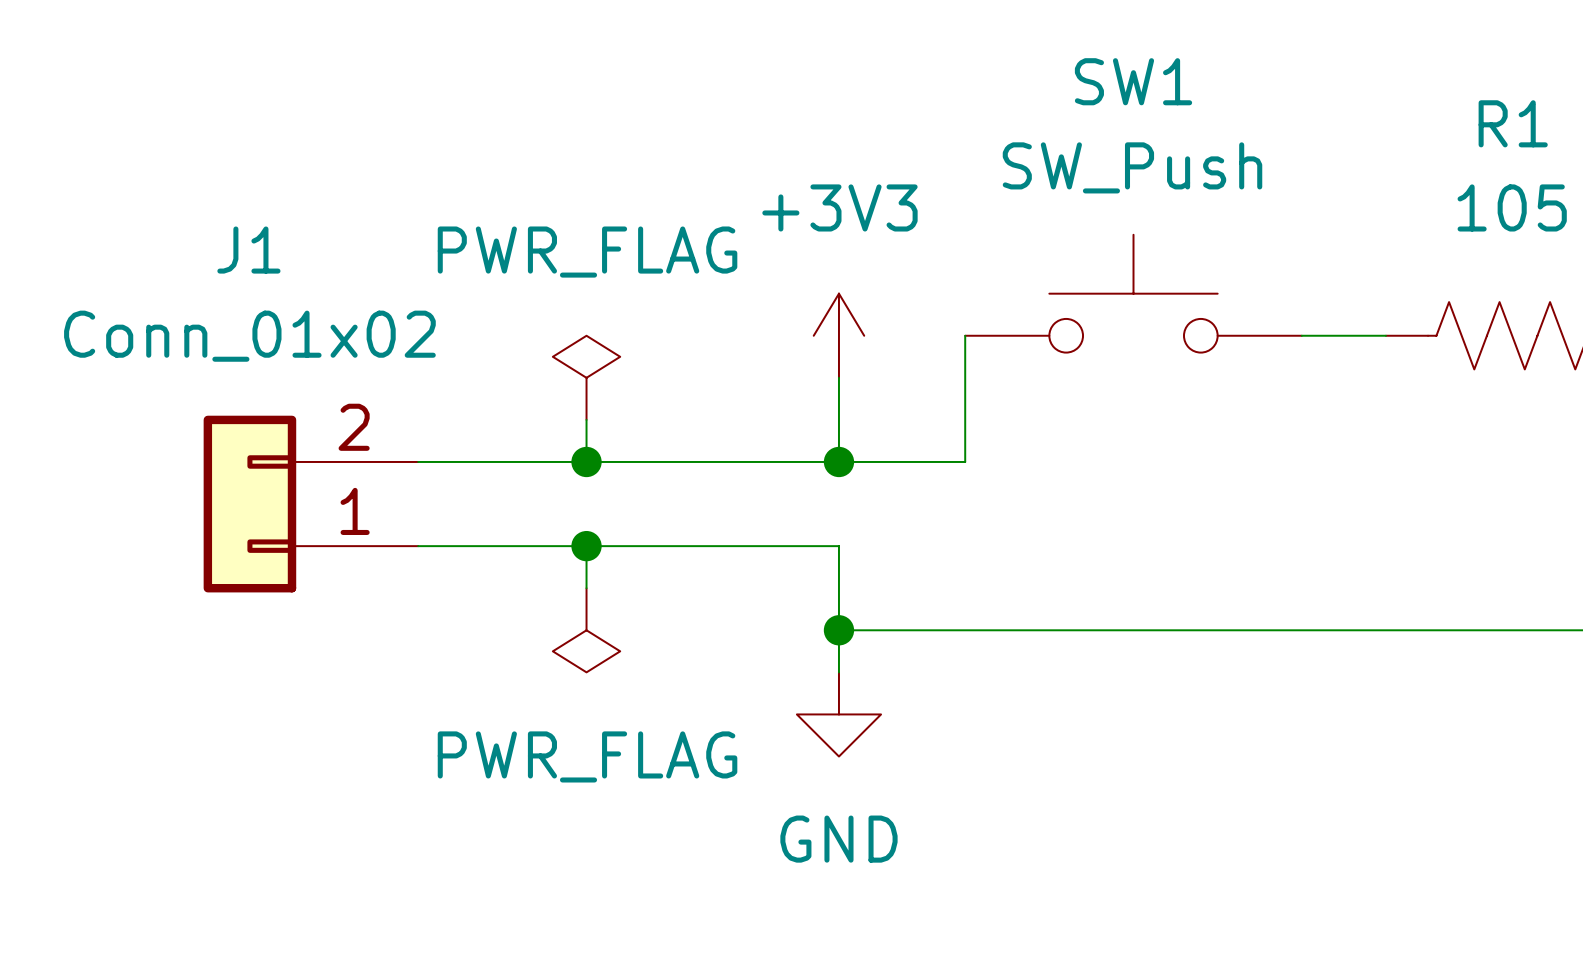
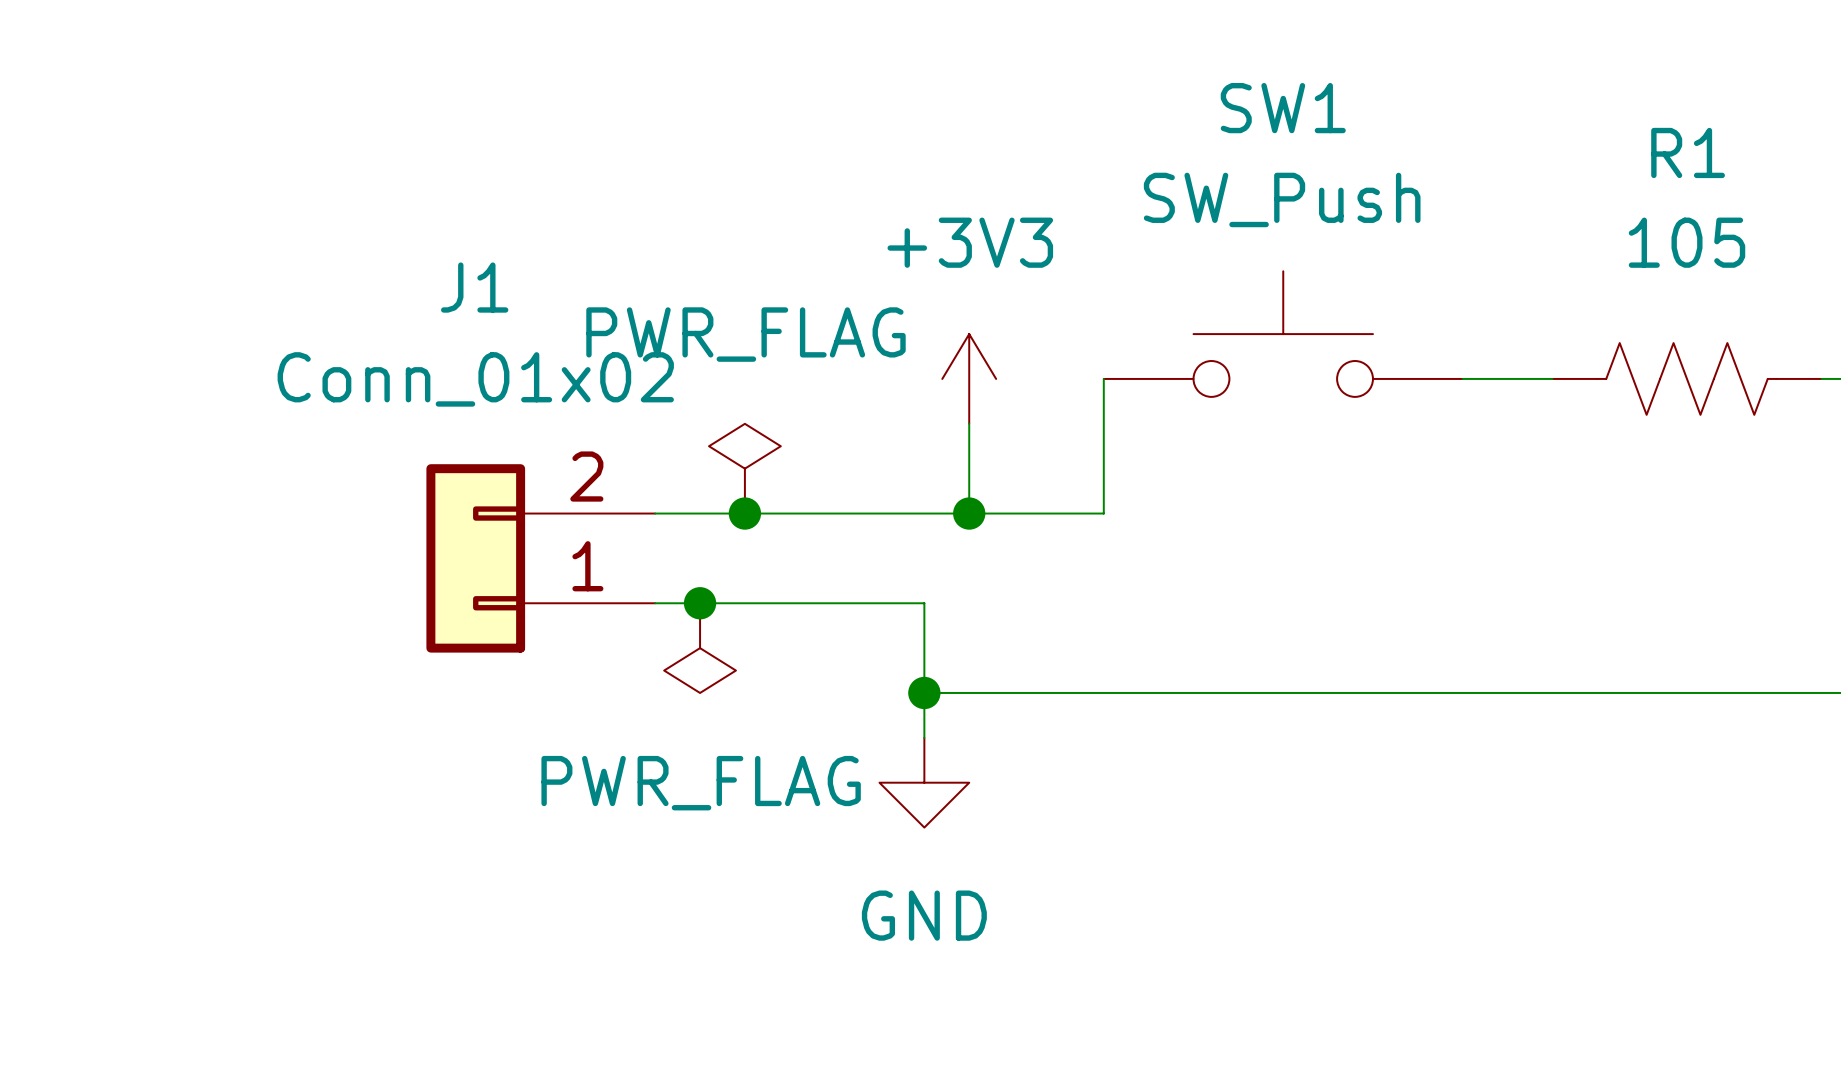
power symbol position: PWR_FLAG (586, 377) -> PWR_FLAG (744, 468)
wire: (586, 419) (586, 461) -> none
junction position: (586, 461) -> (744, 513)
J1 position: (310, 504) -> (540, 558)
wire: (796, 546) (838, 546) (838, 672) -> (924, 603) (924, 737)
power symbol position: PWR_FLAG (586, 630) -> PWR_FLAG (700, 648)
wire: none -> (924, 692) (969, 692)
junction position: (838, 630) -> (924, 692)
power symbol position: GND (838, 714) -> GND (924, 782)

